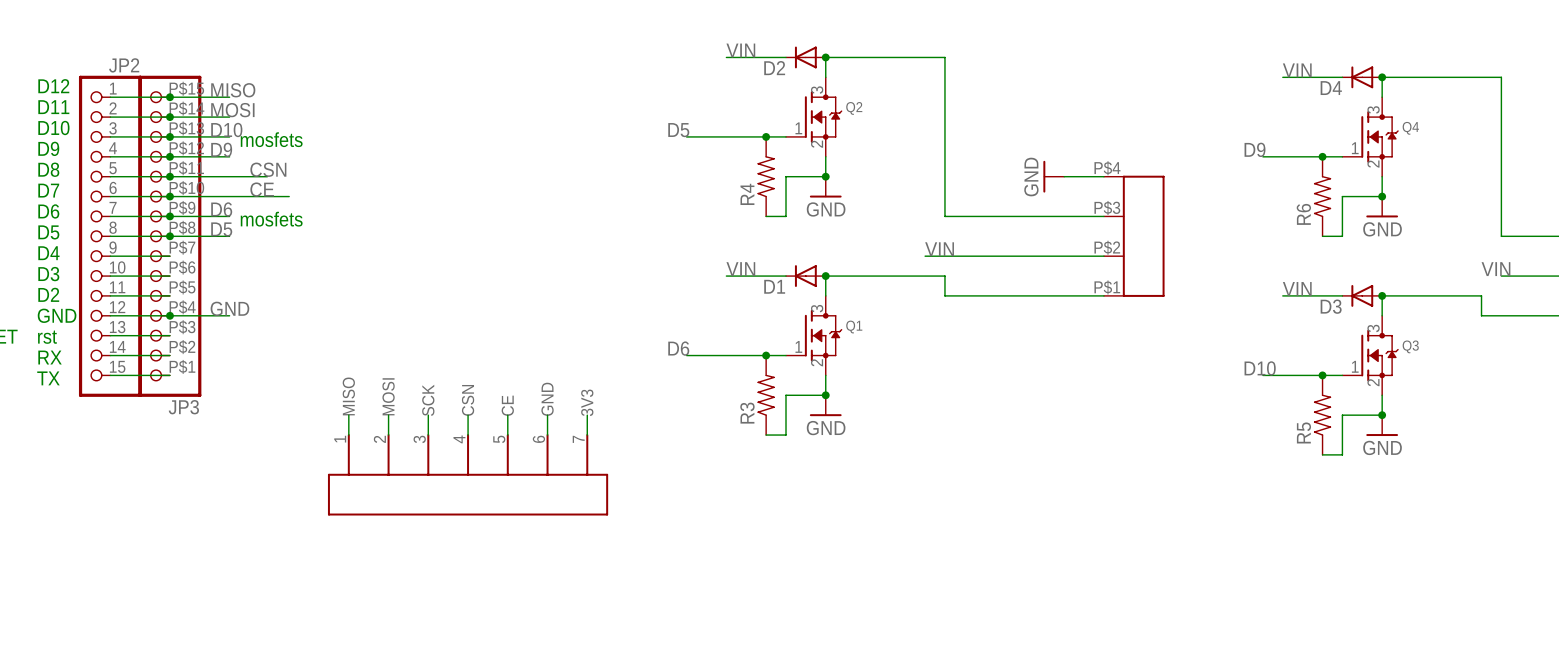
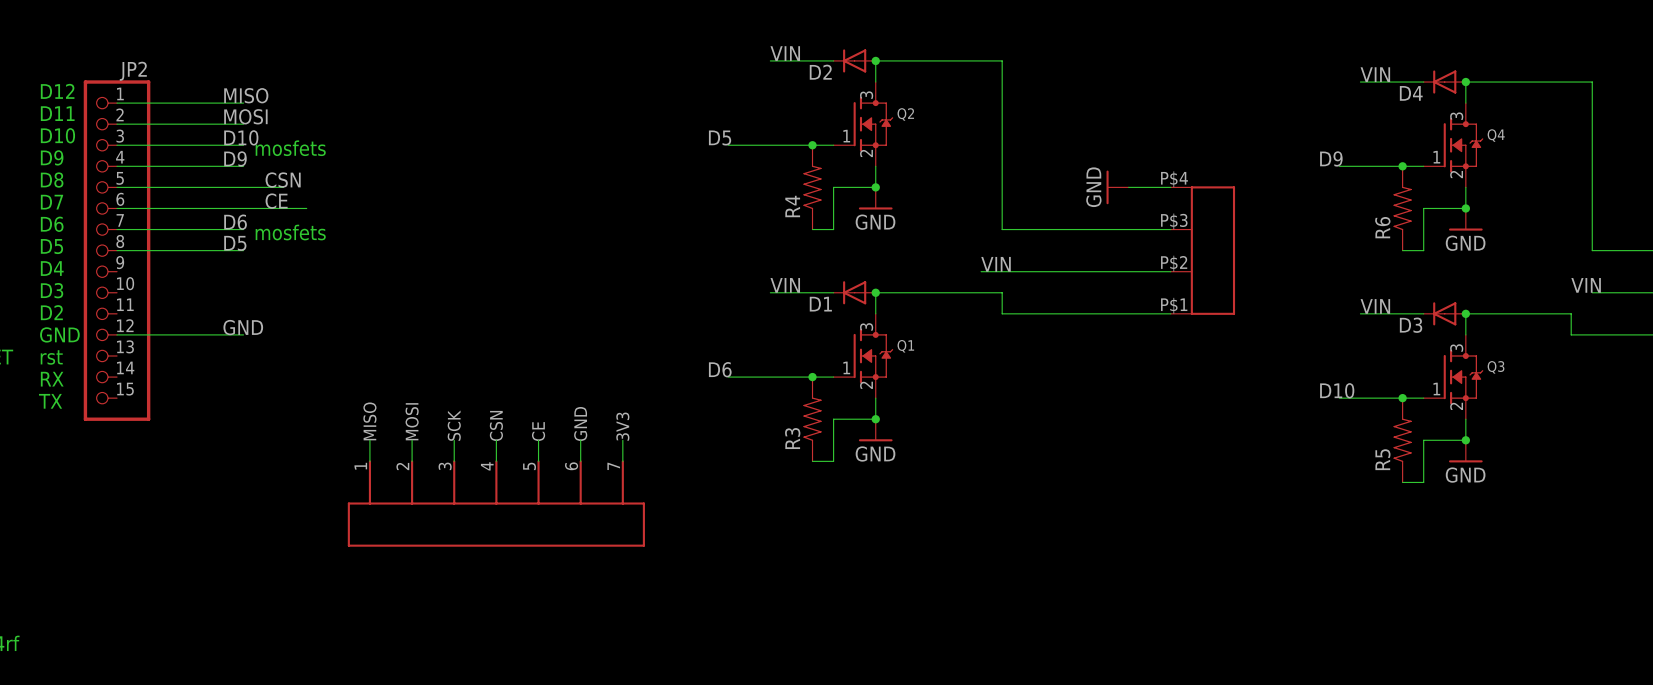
junction: (169, 97) -> none
junction: (169, 117) -> none
junction: (169, 136) -> none
junction: (169, 156) -> none
junction: (169, 176) -> none
junction: (169, 196) -> none
junction: (169, 216) -> none
JP3: (169, 236) -> none
junction: (169, 236) -> none
wire: (110, 256) (169, 256) -> none
wire: (110, 276) (169, 276) -> none
wire: (110, 295) (169, 295) -> none
junction: (169, 315) -> none
wire: (110, 335) (169, 335) -> none
wire: (110, 355) (169, 355) -> none
wire: (110, 375) (169, 375) -> none

